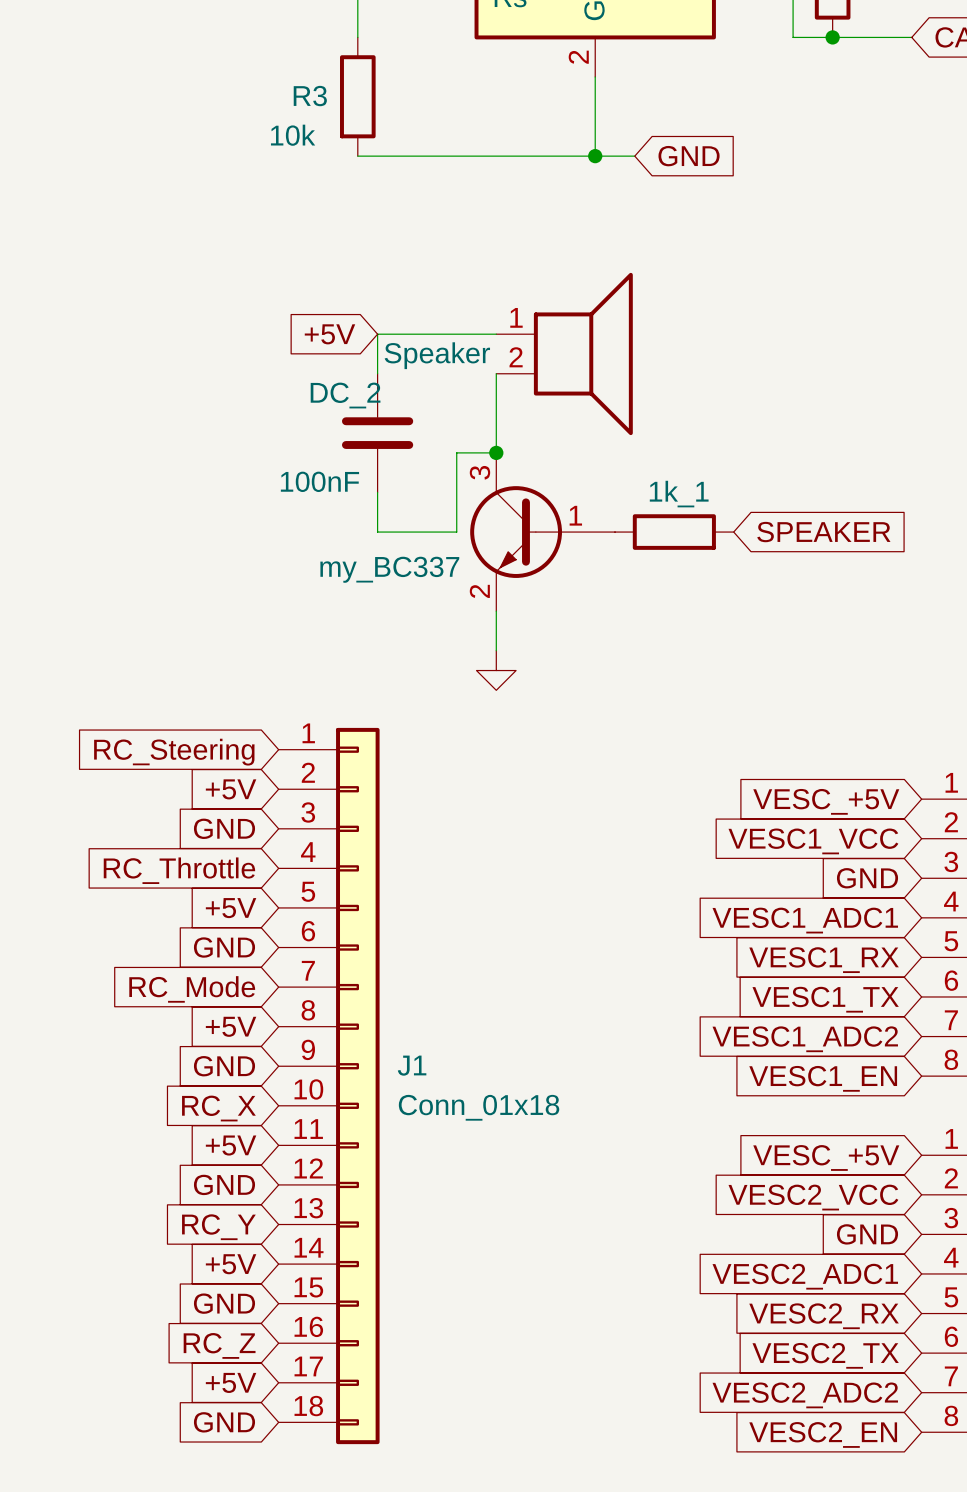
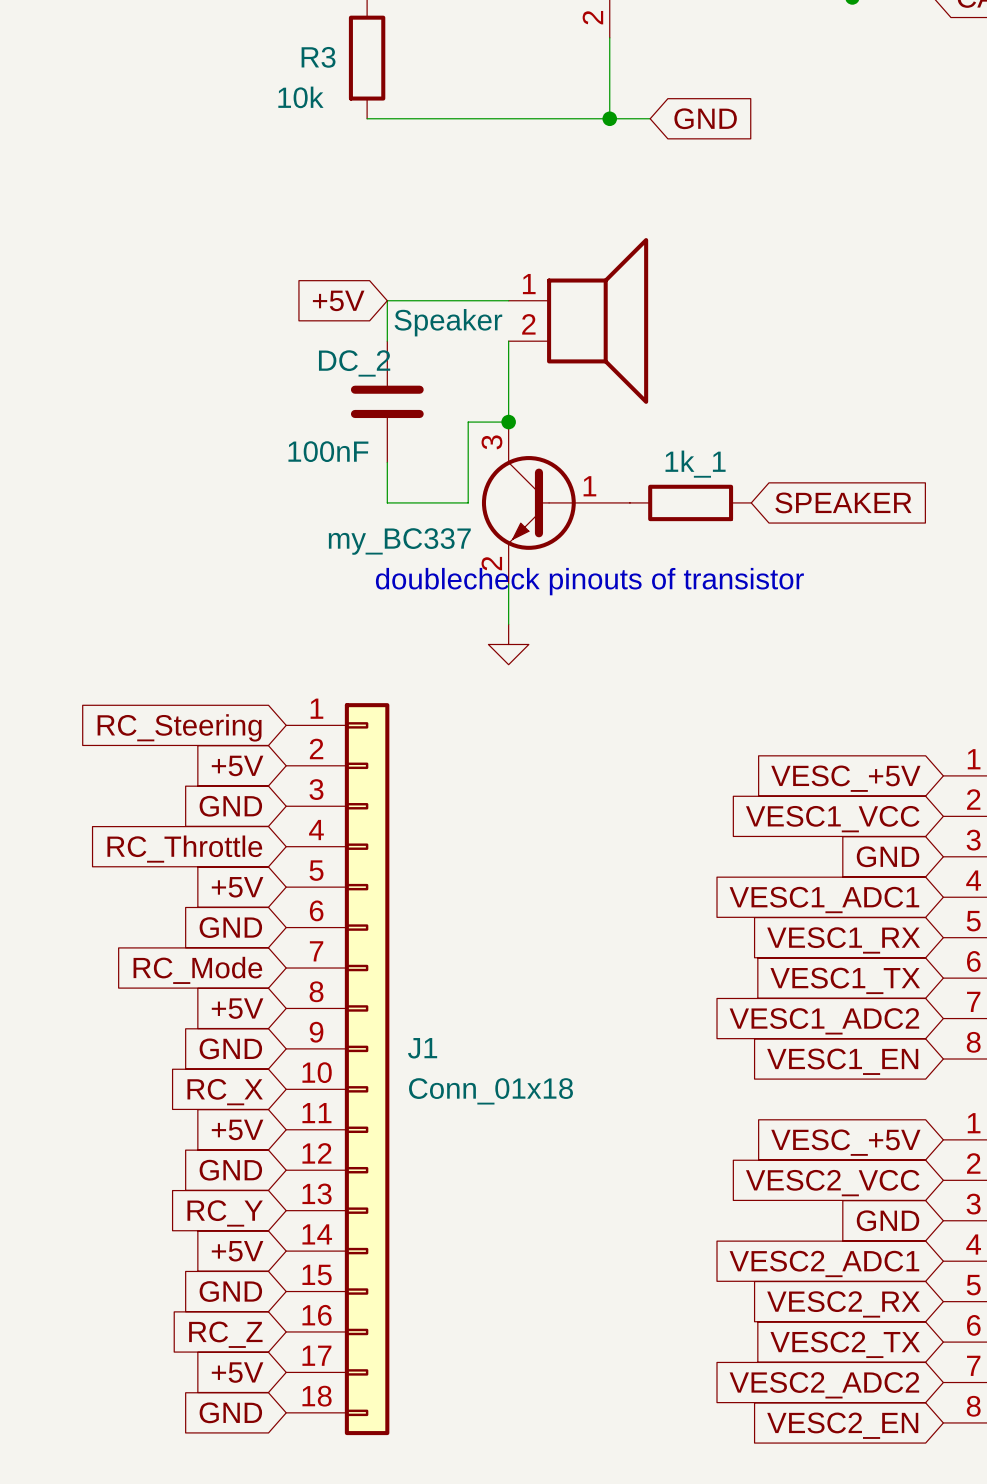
text: none -> doublecheck pinouts of transistor (589, 581)

